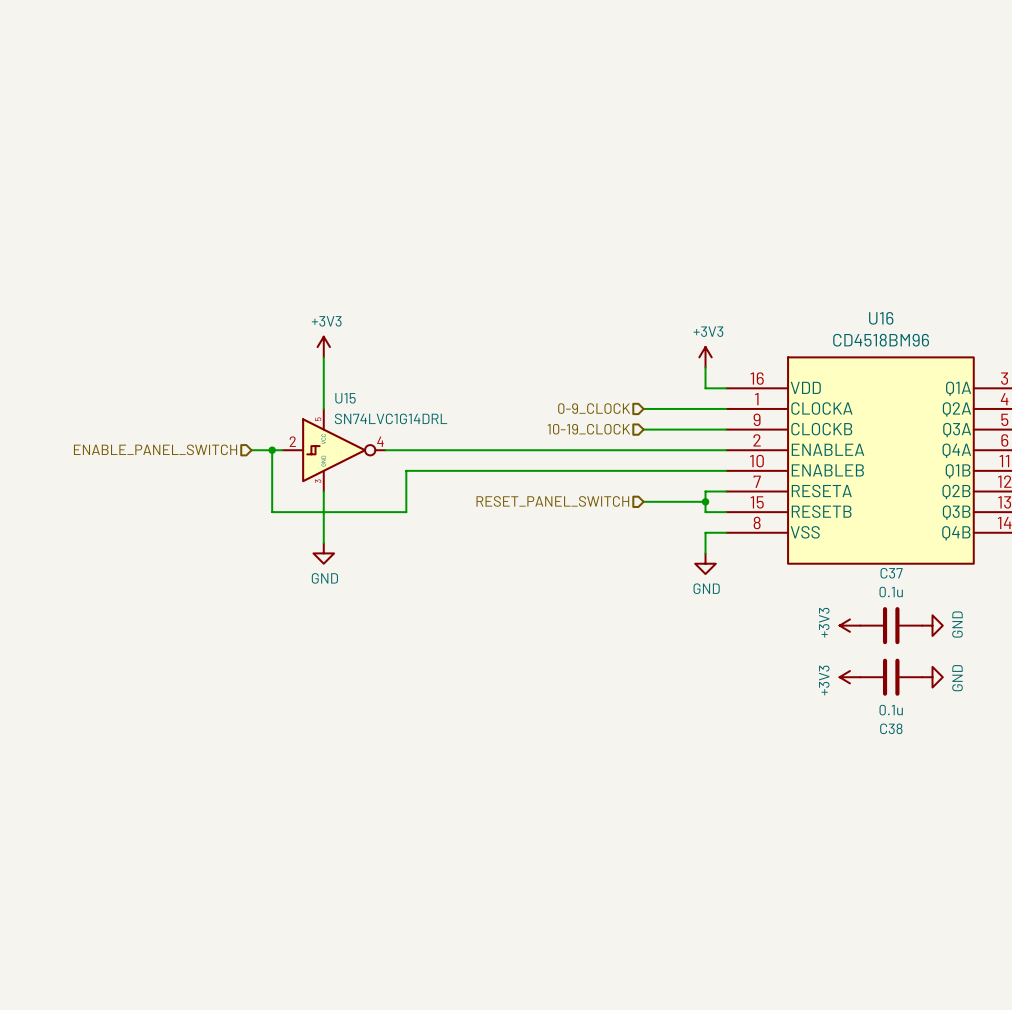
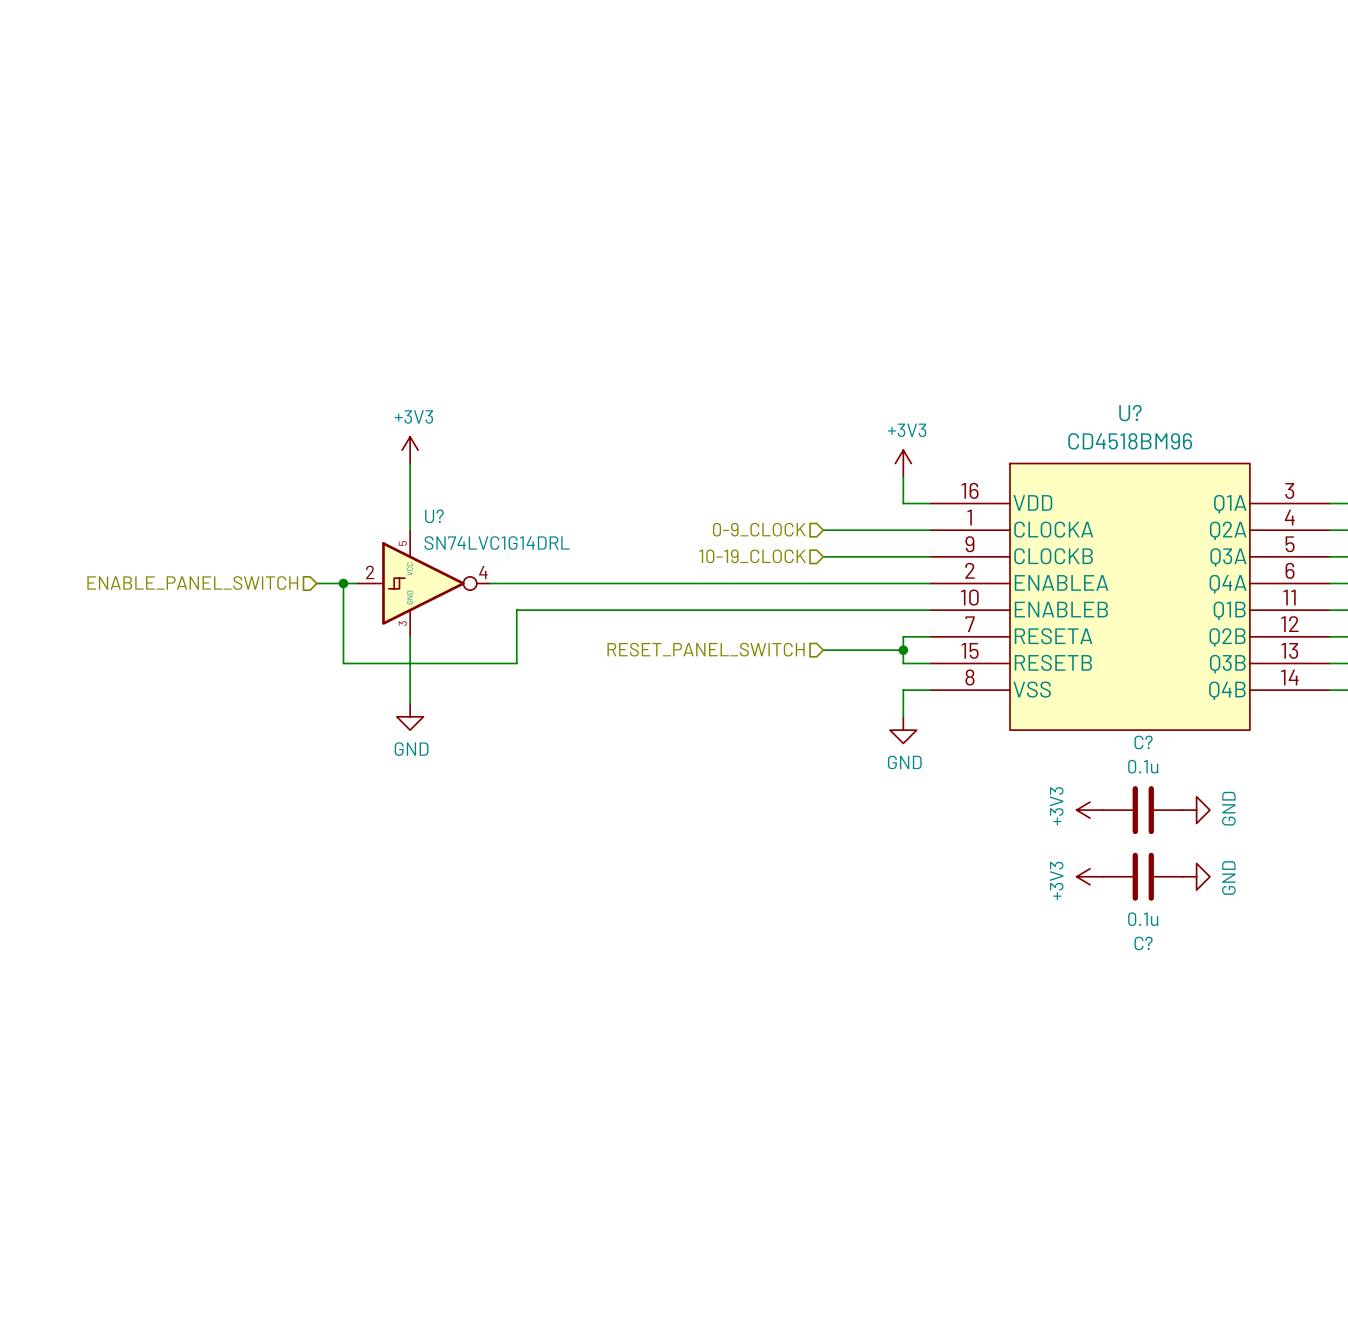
U16 name: U16 (881, 318) -> U? (1130, 413)
U15 name: U15 (345, 398) -> U? (434, 516)
C37 name: C37 (891, 573) -> C? (1143, 742)
C38 name: C38 (891, 728) -> C? (1143, 943)

